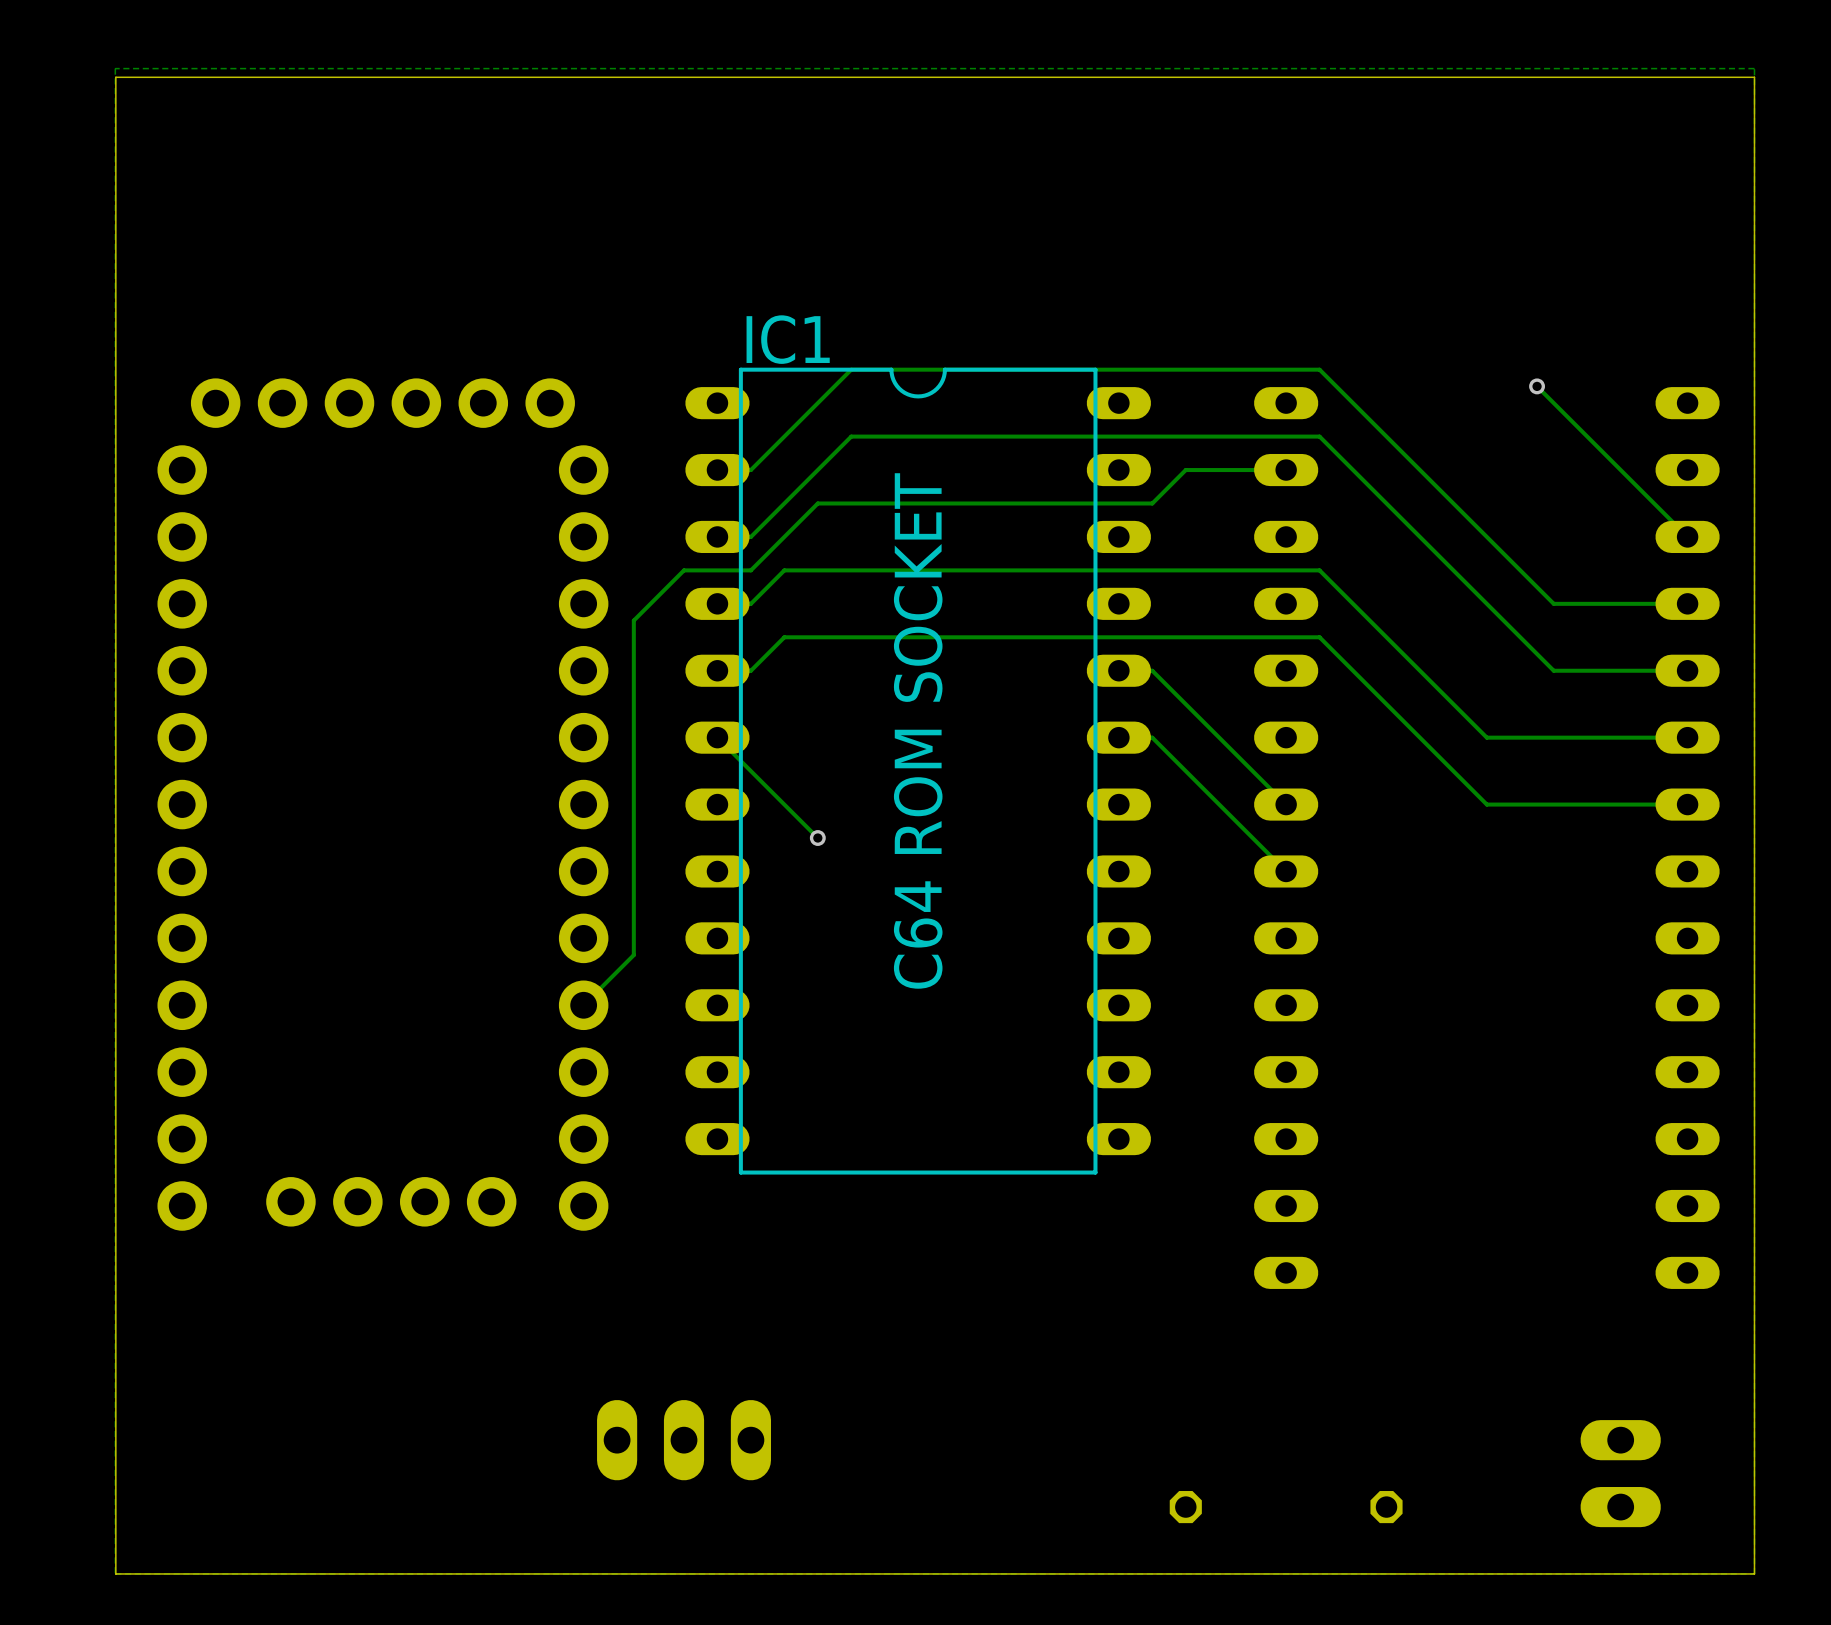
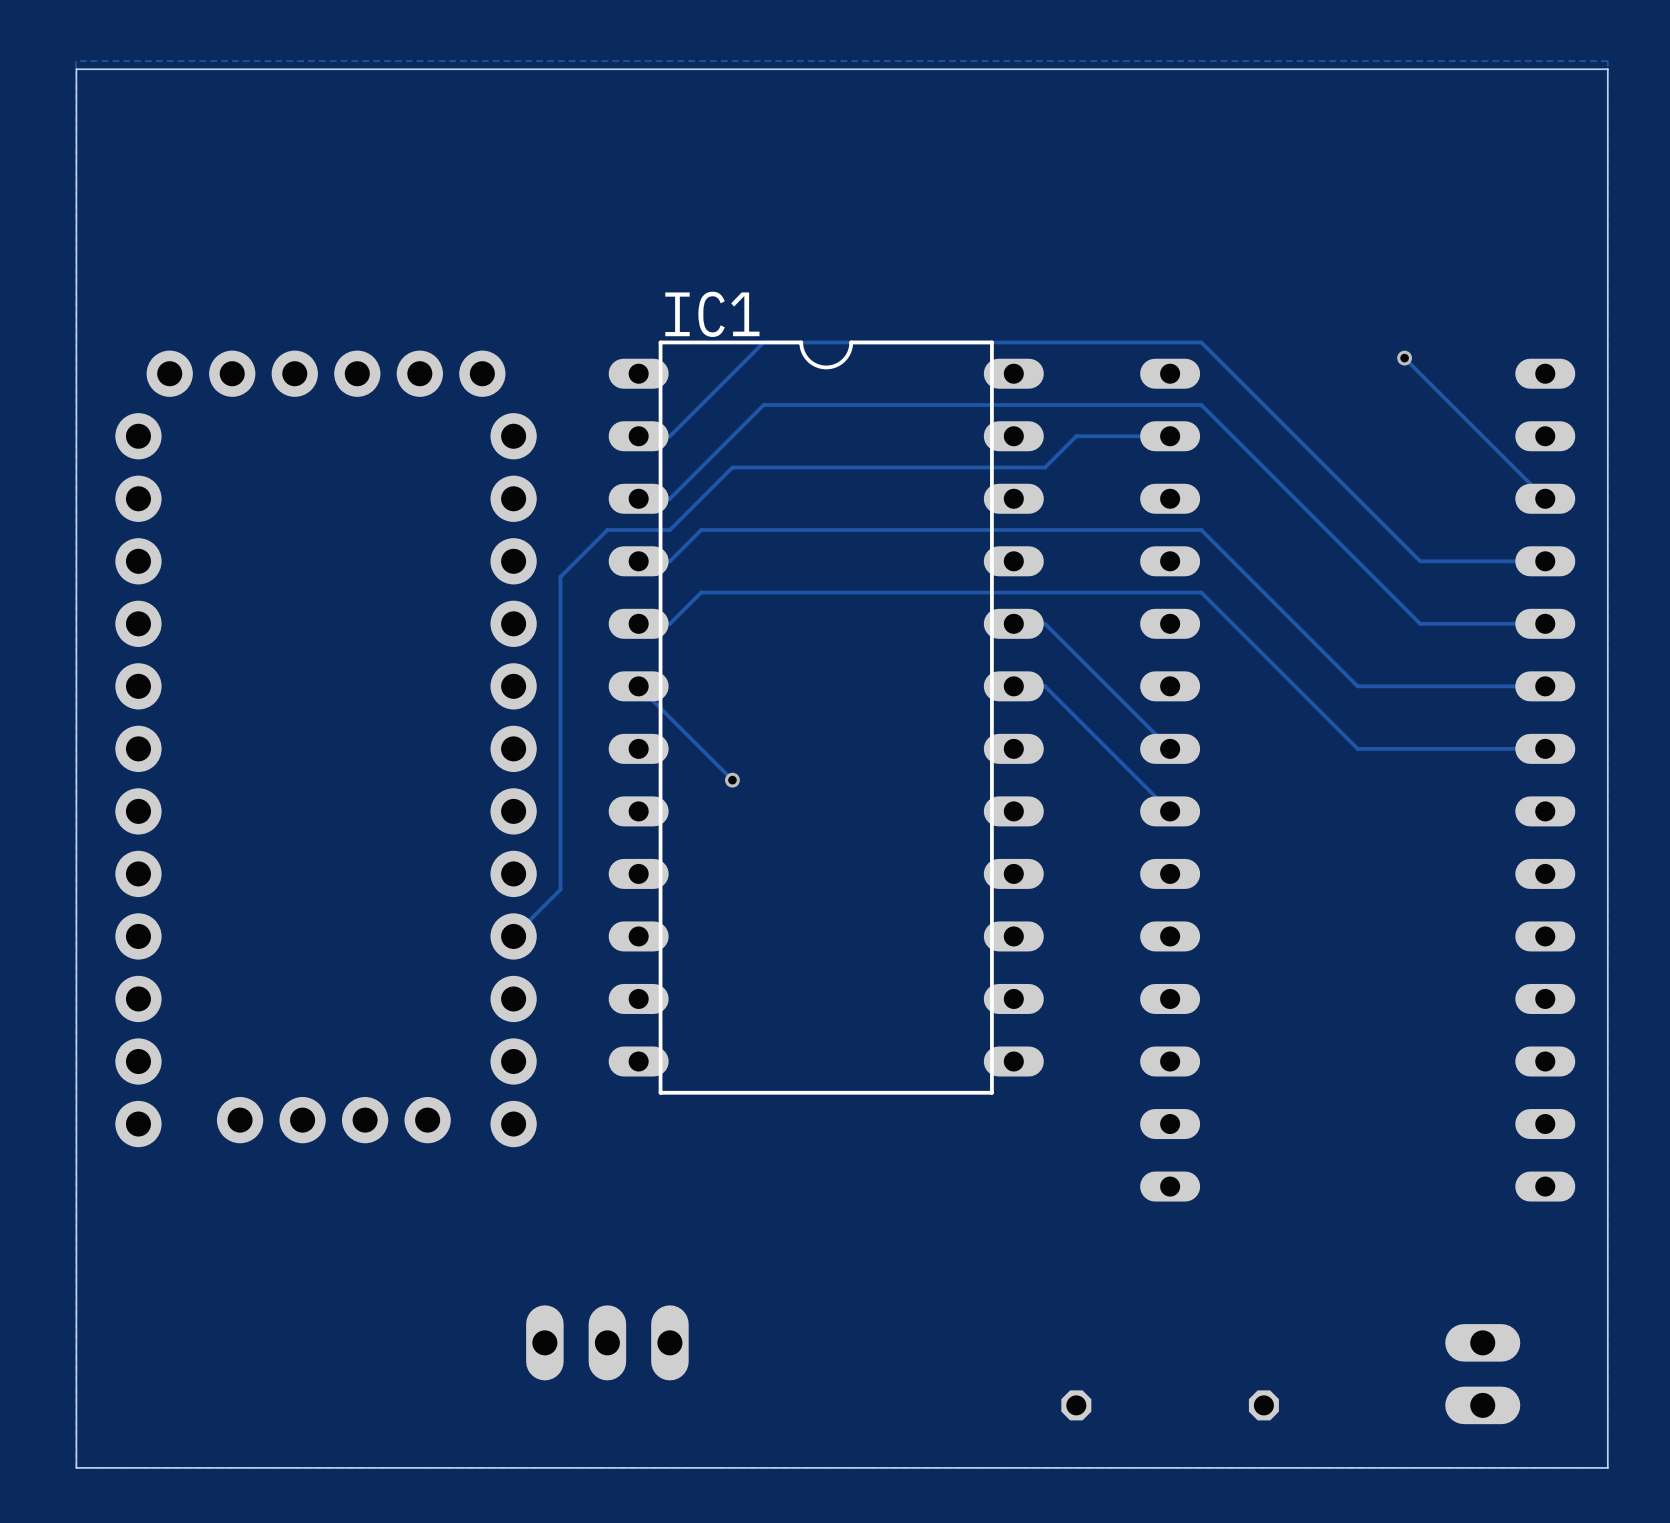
IC1 value: C64 ROM SOCKET (918, 730) -> none

